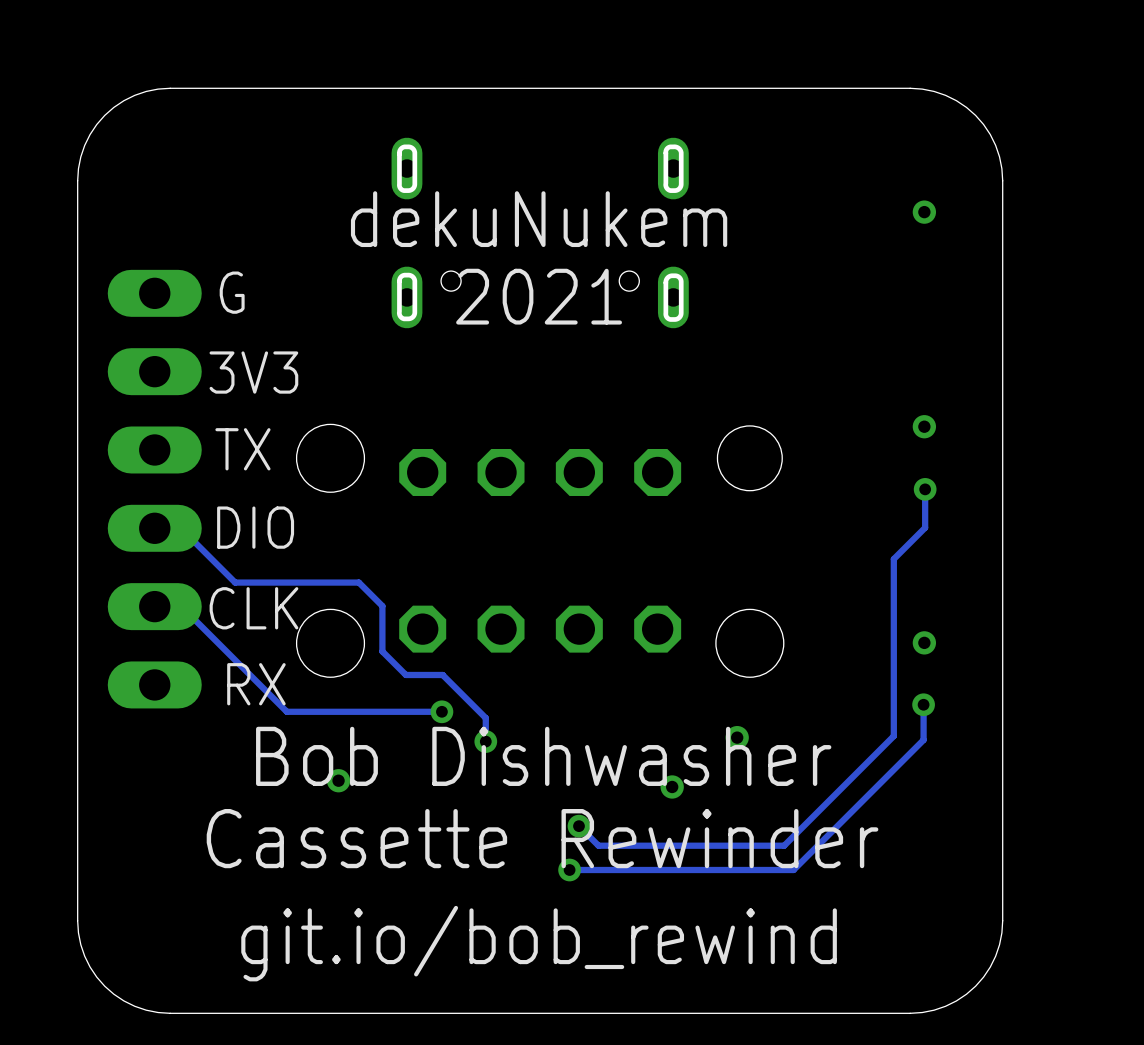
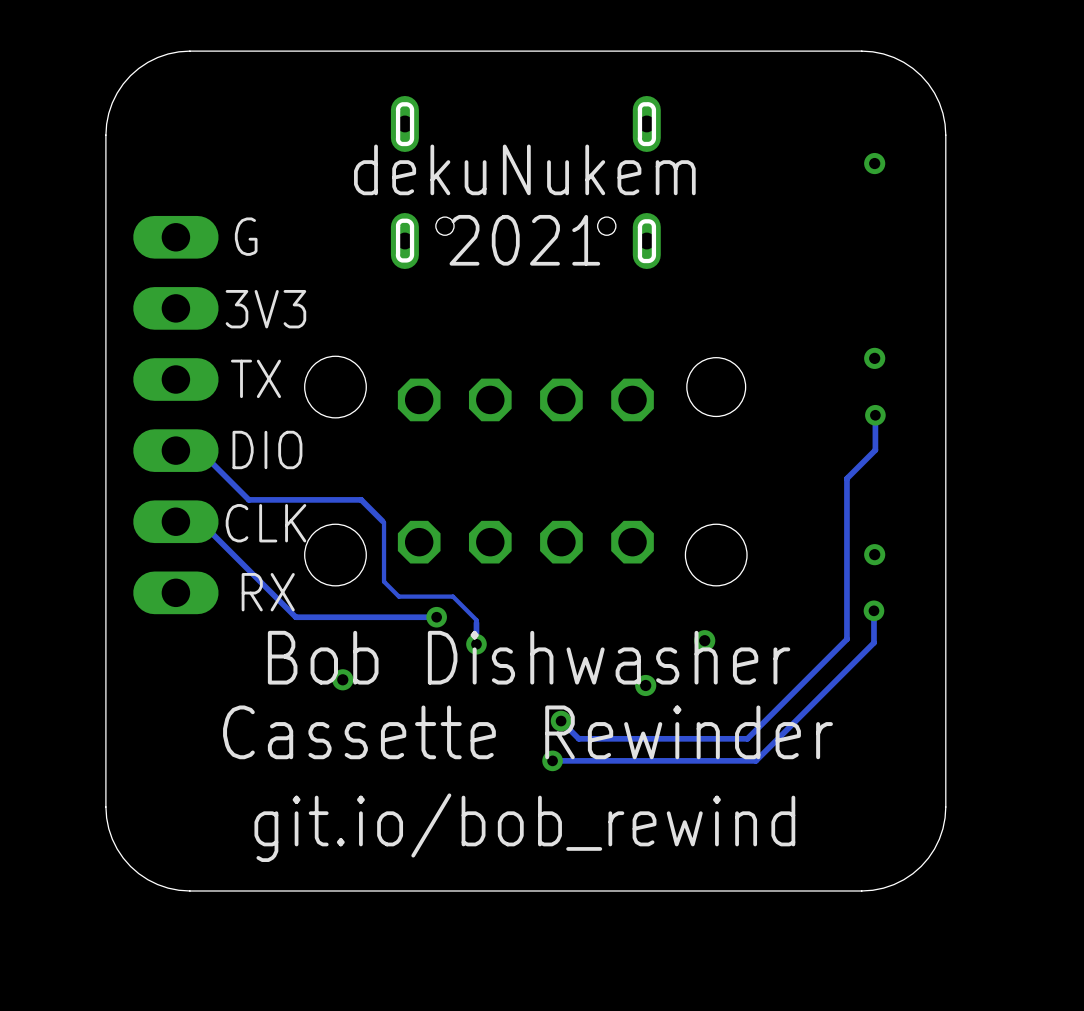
track: (382, 606) (382, 651) (405, 674) (442, 674) (485, 718) -> (382, 521) (384, 581) (398, 596) (453, 596) (476, 620) (476, 622)

